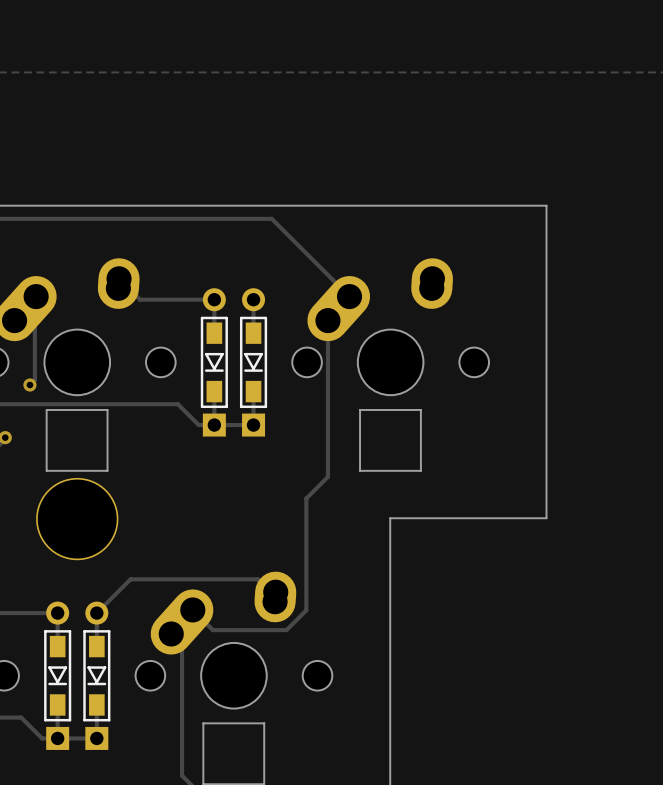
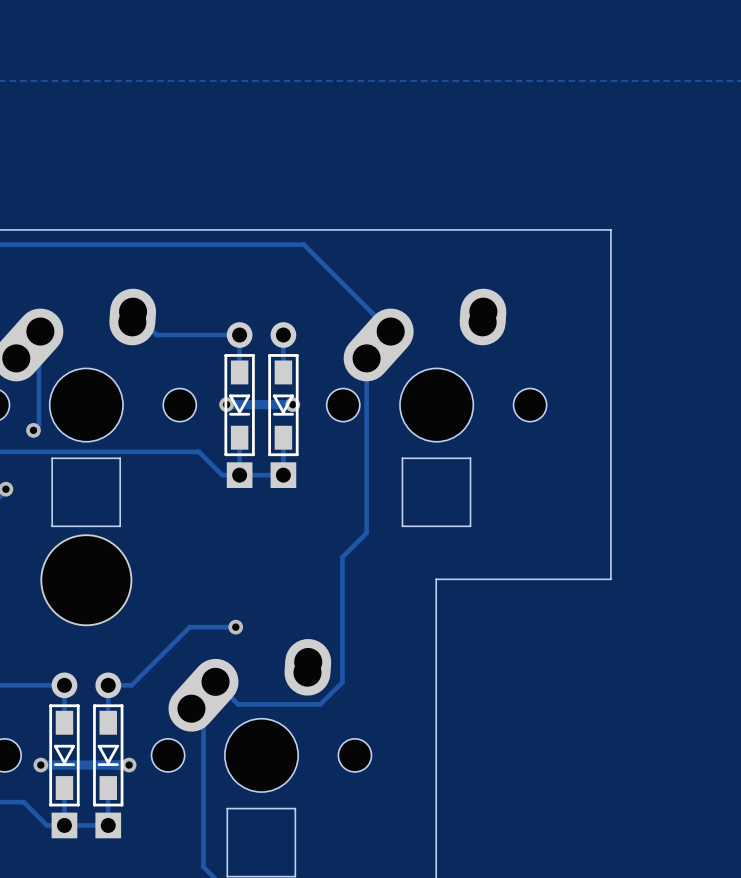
track: none -> (226, 404) (292, 404)
via: none -> (226, 404)
via: none -> (292, 404)
via: none -> (235, 627)
track: (275, 596) (257, 579) (130, 579) (96, 613) -> (235, 627) (189, 627) (131, 685) (108, 685)
track: none -> (40, 765) (129, 765)
via: none -> (40, 765)
via: none -> (129, 765)

